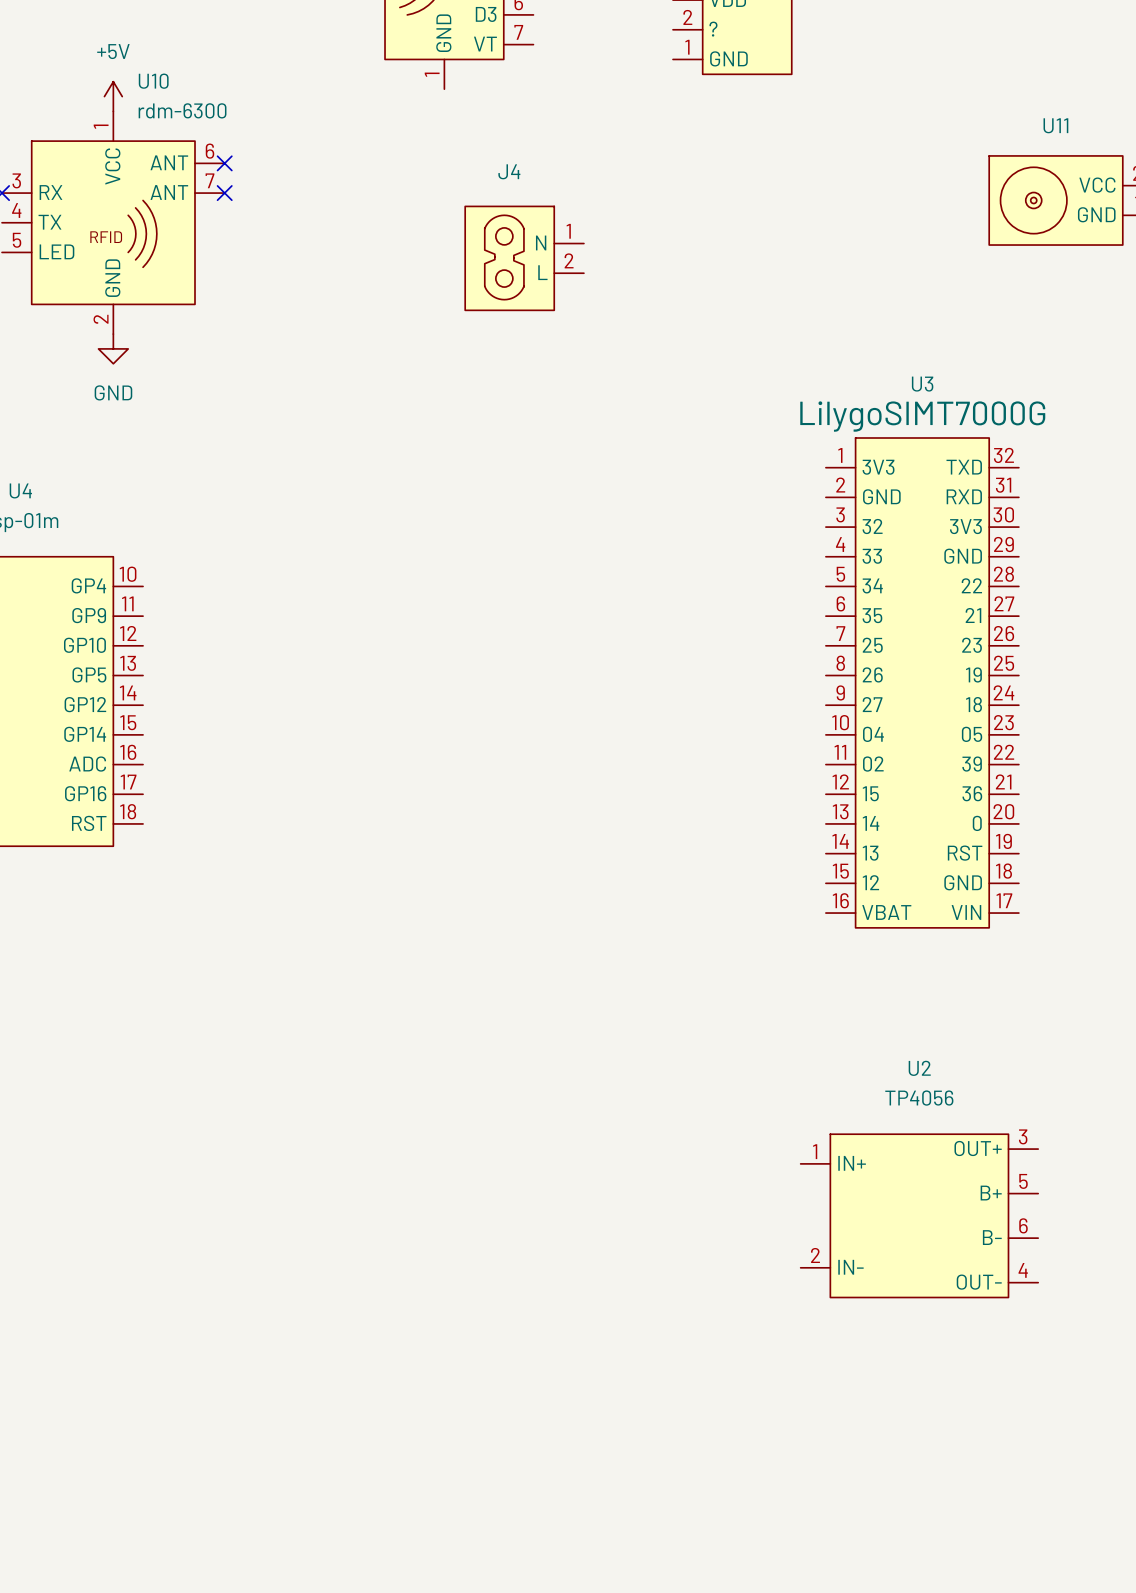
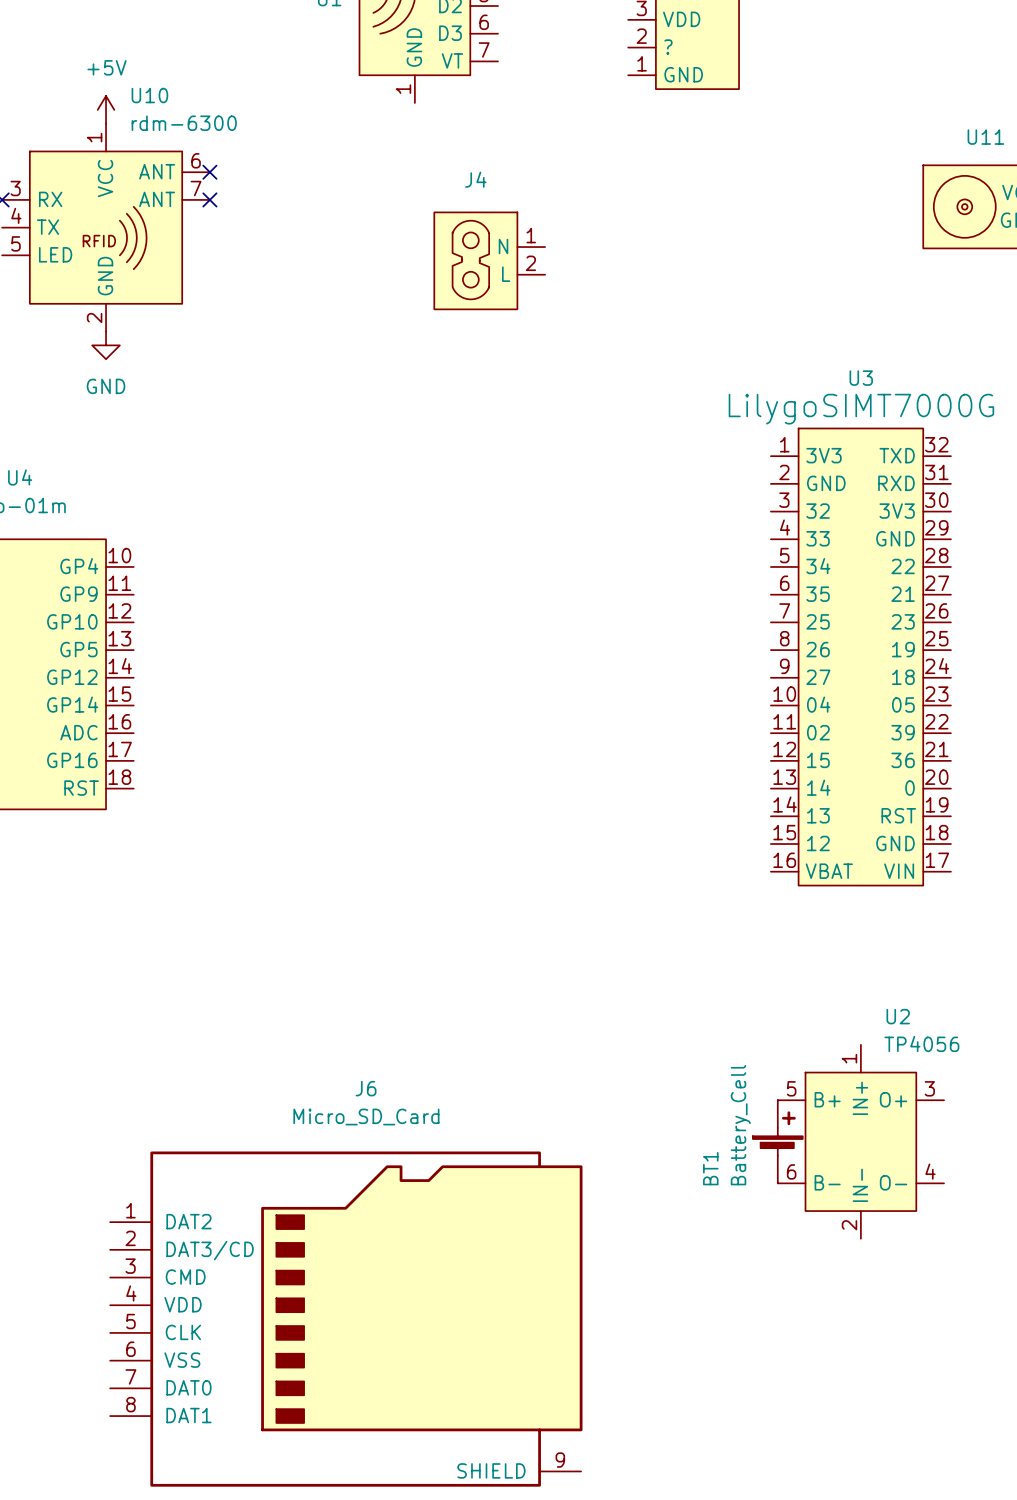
U2 name position: U2 (919, 1068) -> U2 (898, 1016)
U2 value position: TP4056 (919, 1098) -> TP4056 (921, 1044)
U2 symbol: [800, 1134, 1039, 1298] -> [777, 1044, 945, 1239]
BT1: none -> Battery_Cell (777, 1141)
J6: none -> Micro_SD_Card (346, 1319)

